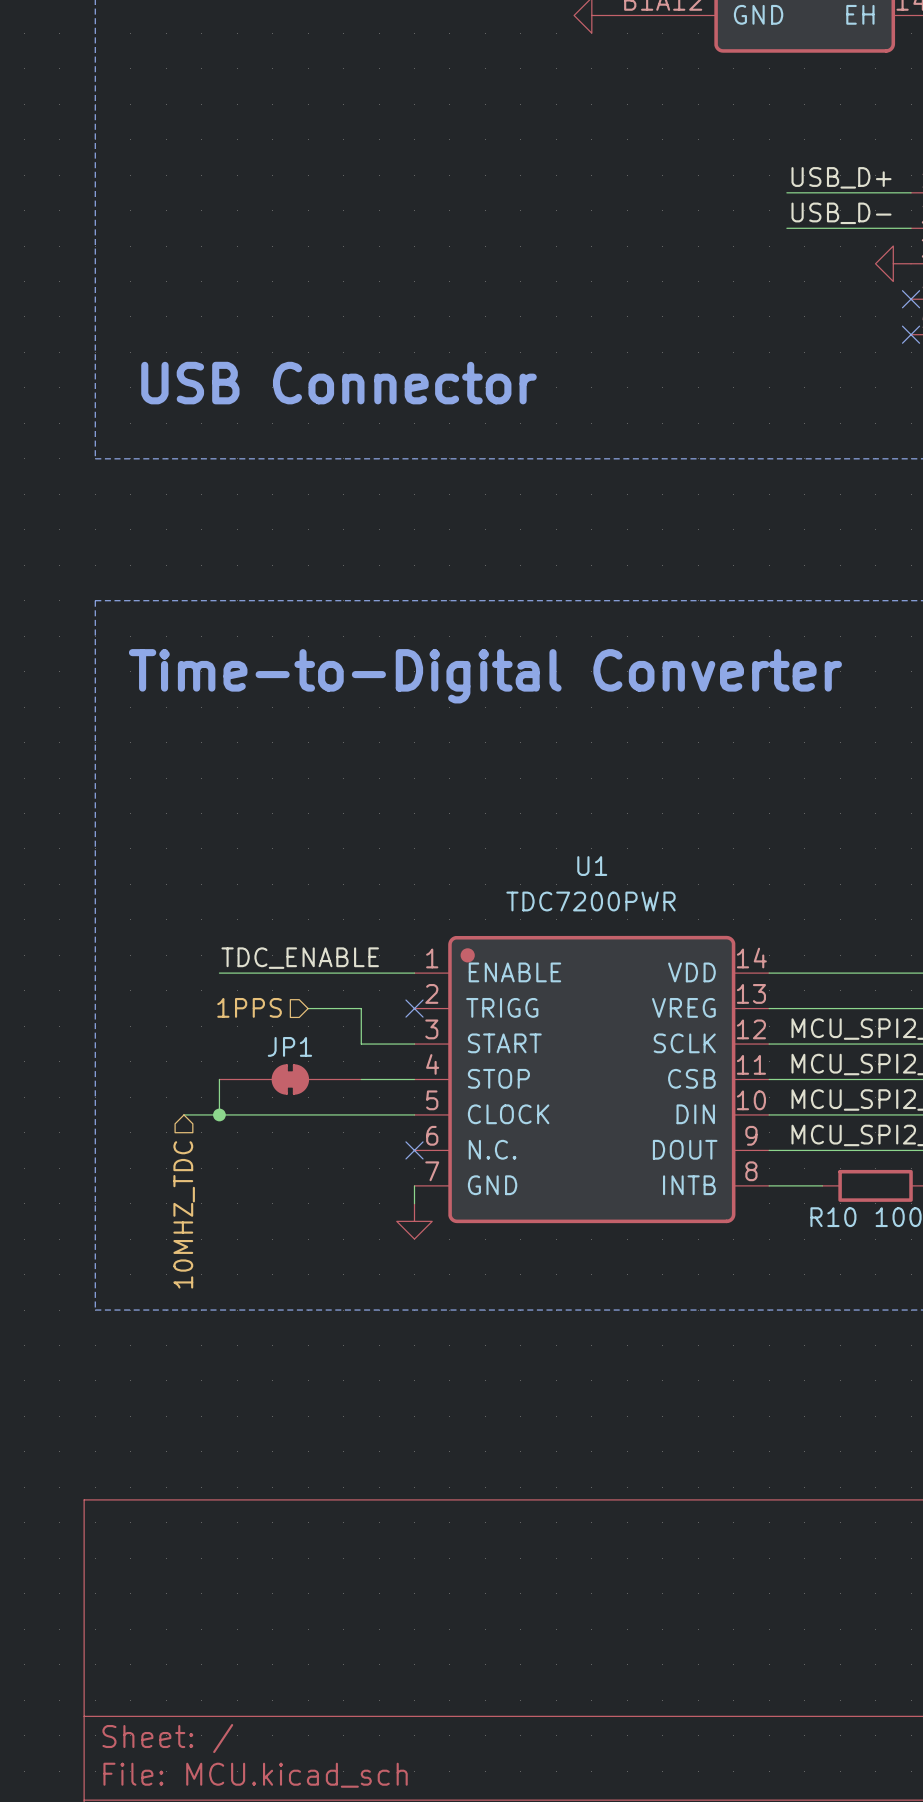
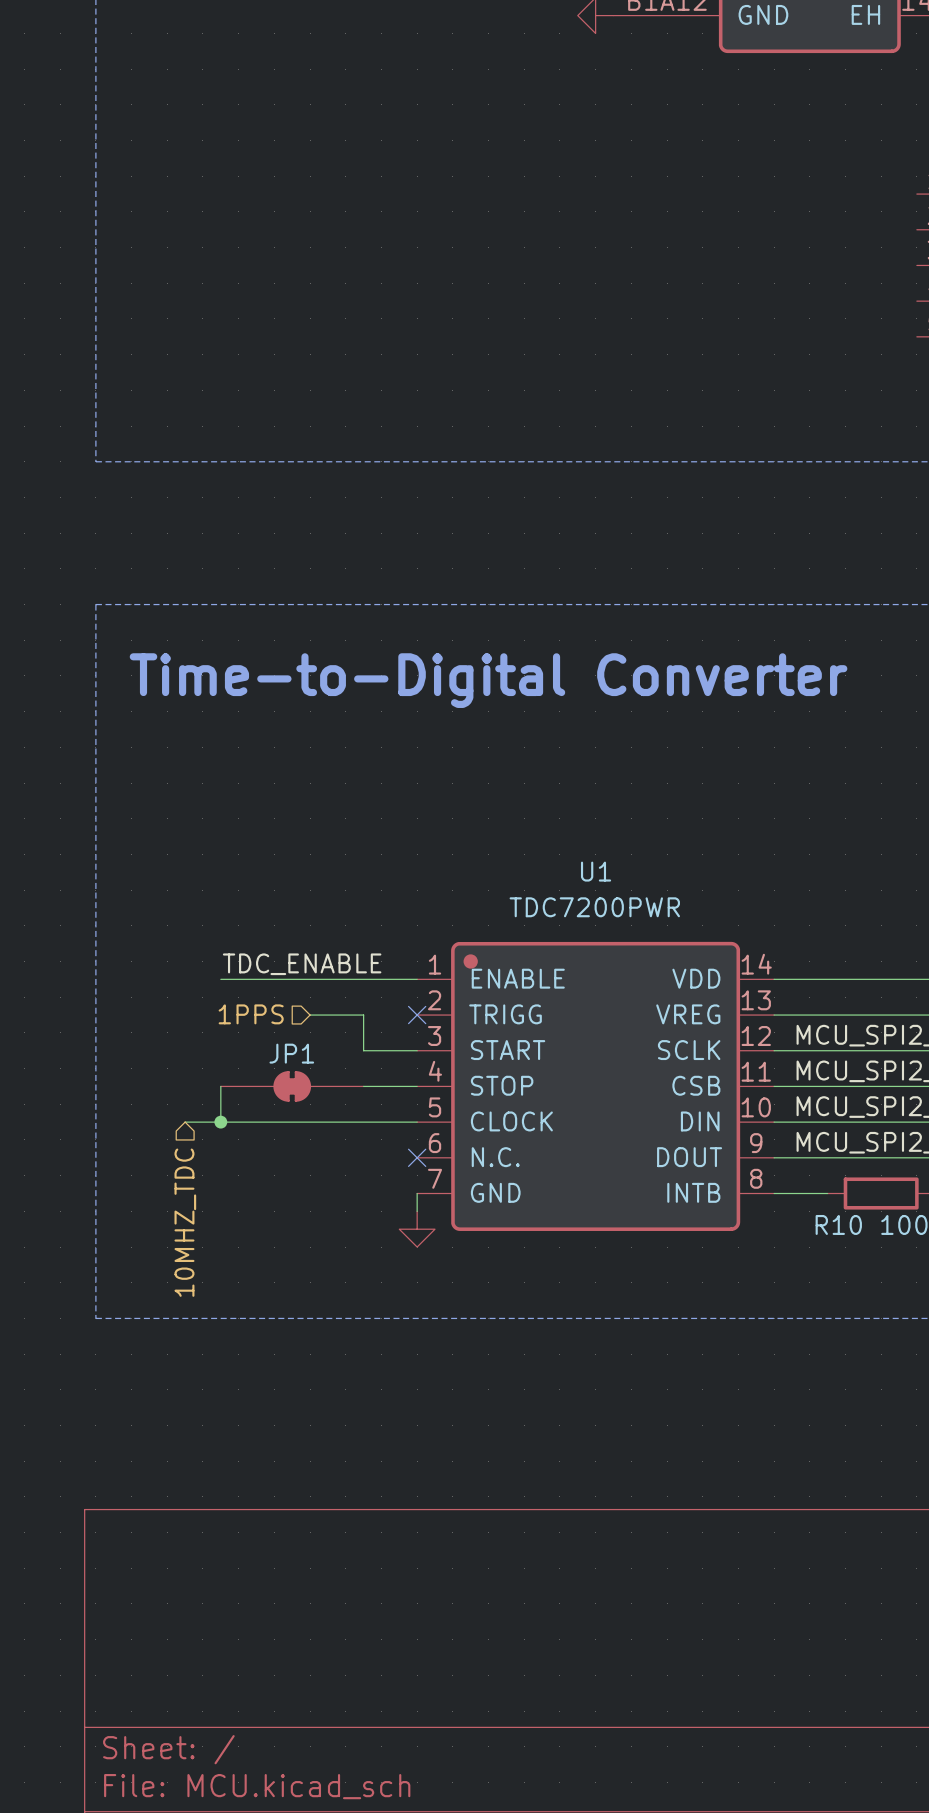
label: USB_D+ (841, 177) -> none
wire: (786, 192) (911, 192) -> none
label: USB_D- (841, 213) -> none
wire: (786, 228) (911, 228) -> none
power symbol: (893, 263) -> none
no-connect mark: (911, 299) -> none
no-connect mark: (911, 334) -> none
text: USB Connector (339, 383) -> none

